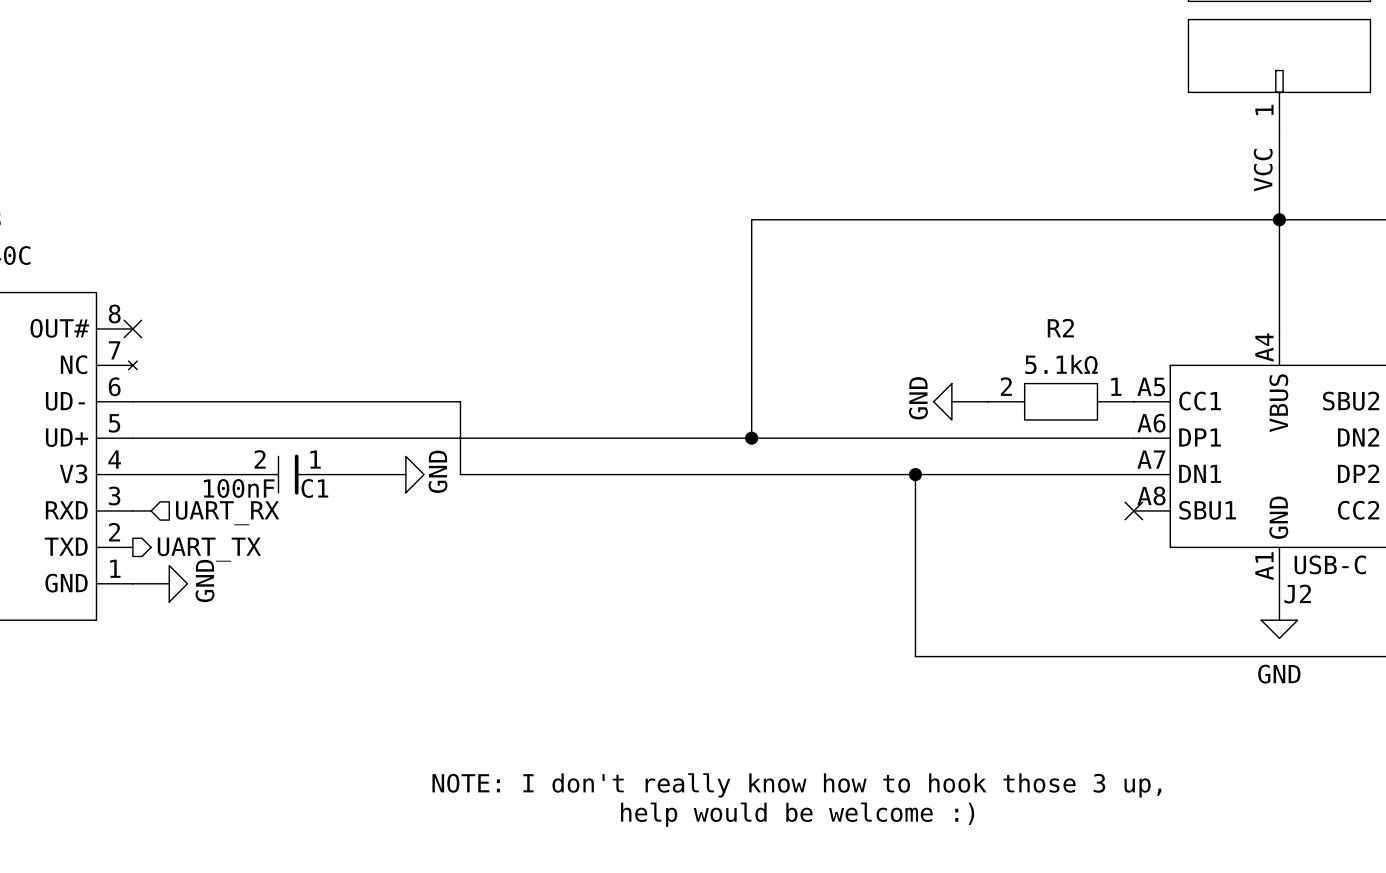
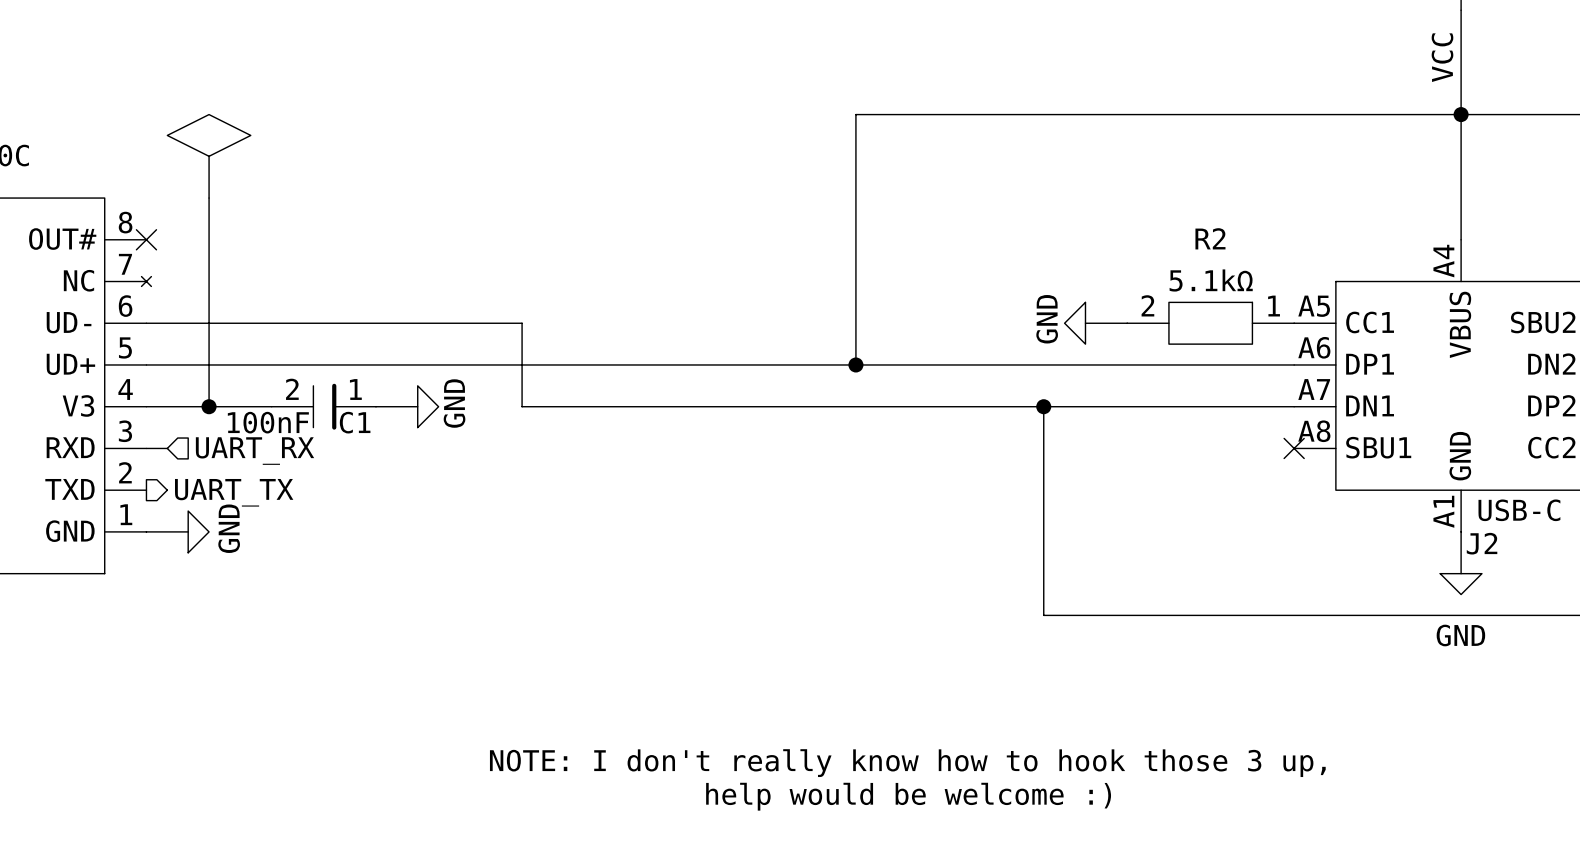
power symbol: none -> (209, 156)
wire: none -> (209, 198) (209, 406)
junction: none -> (209, 406)
power symbol position: GND (396, 474) -> GND (407, 406)

